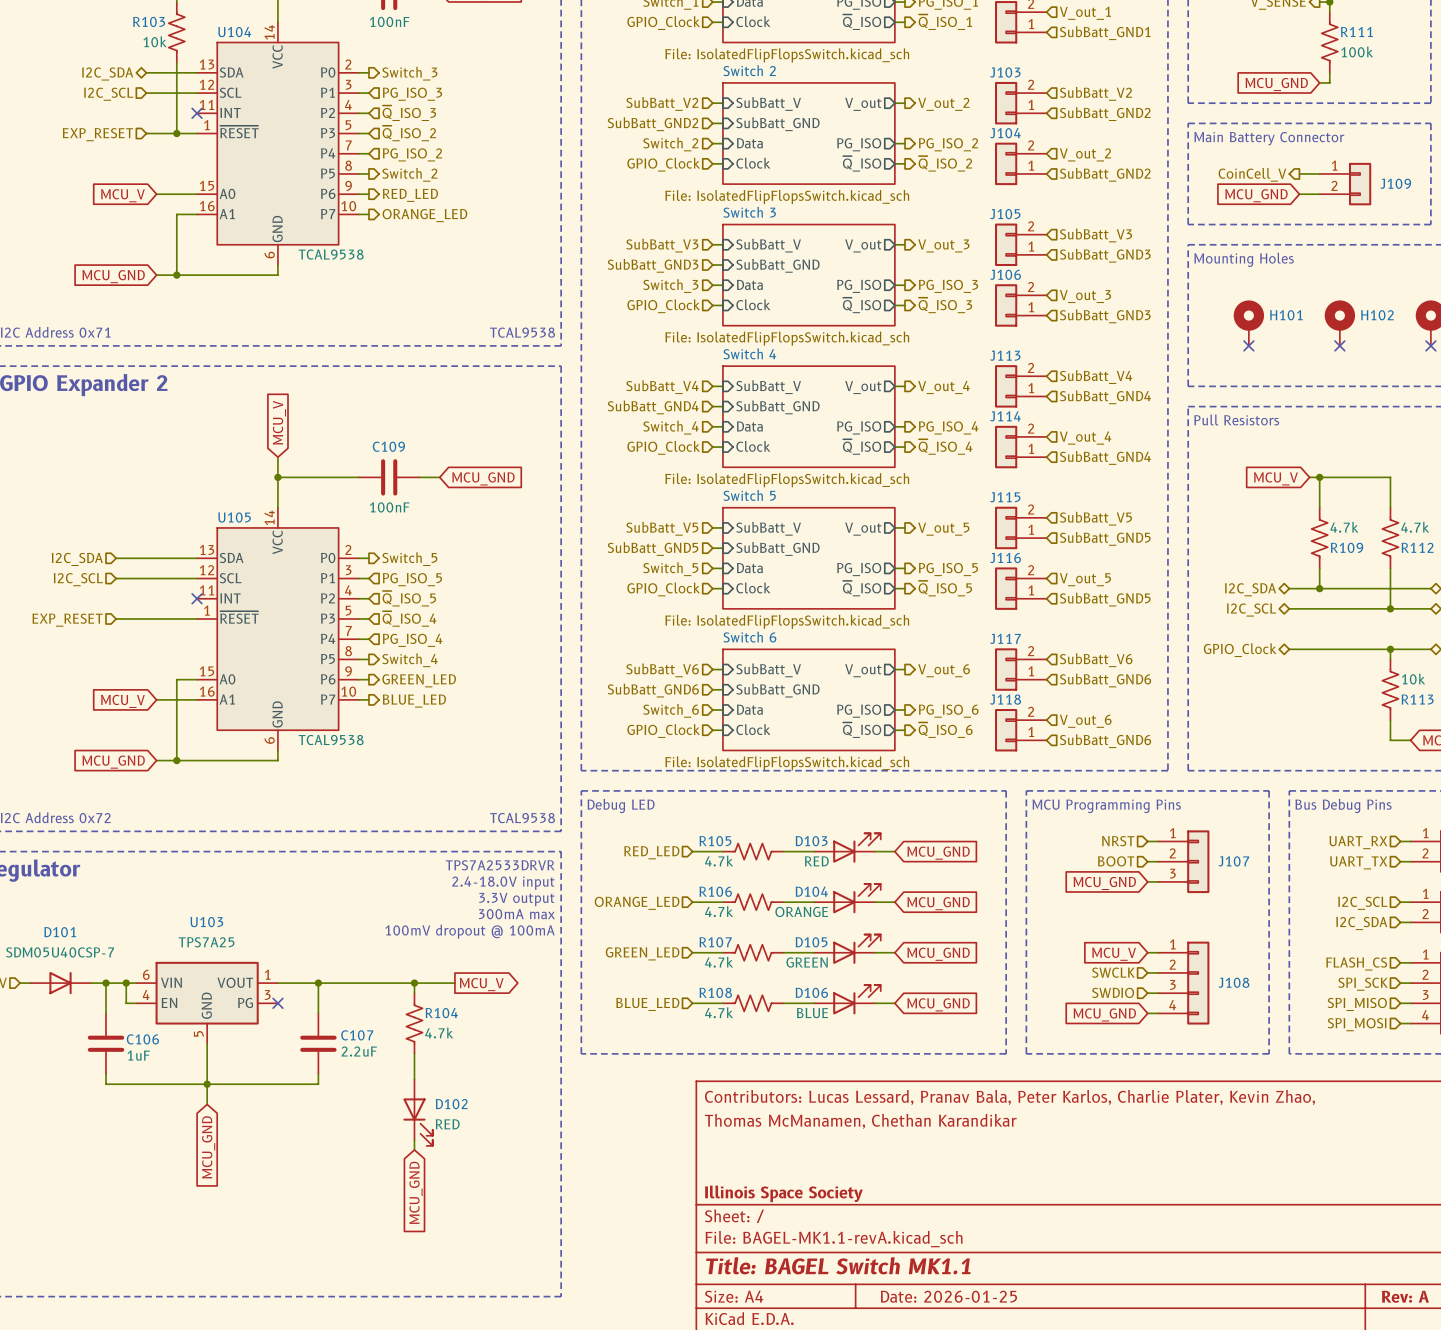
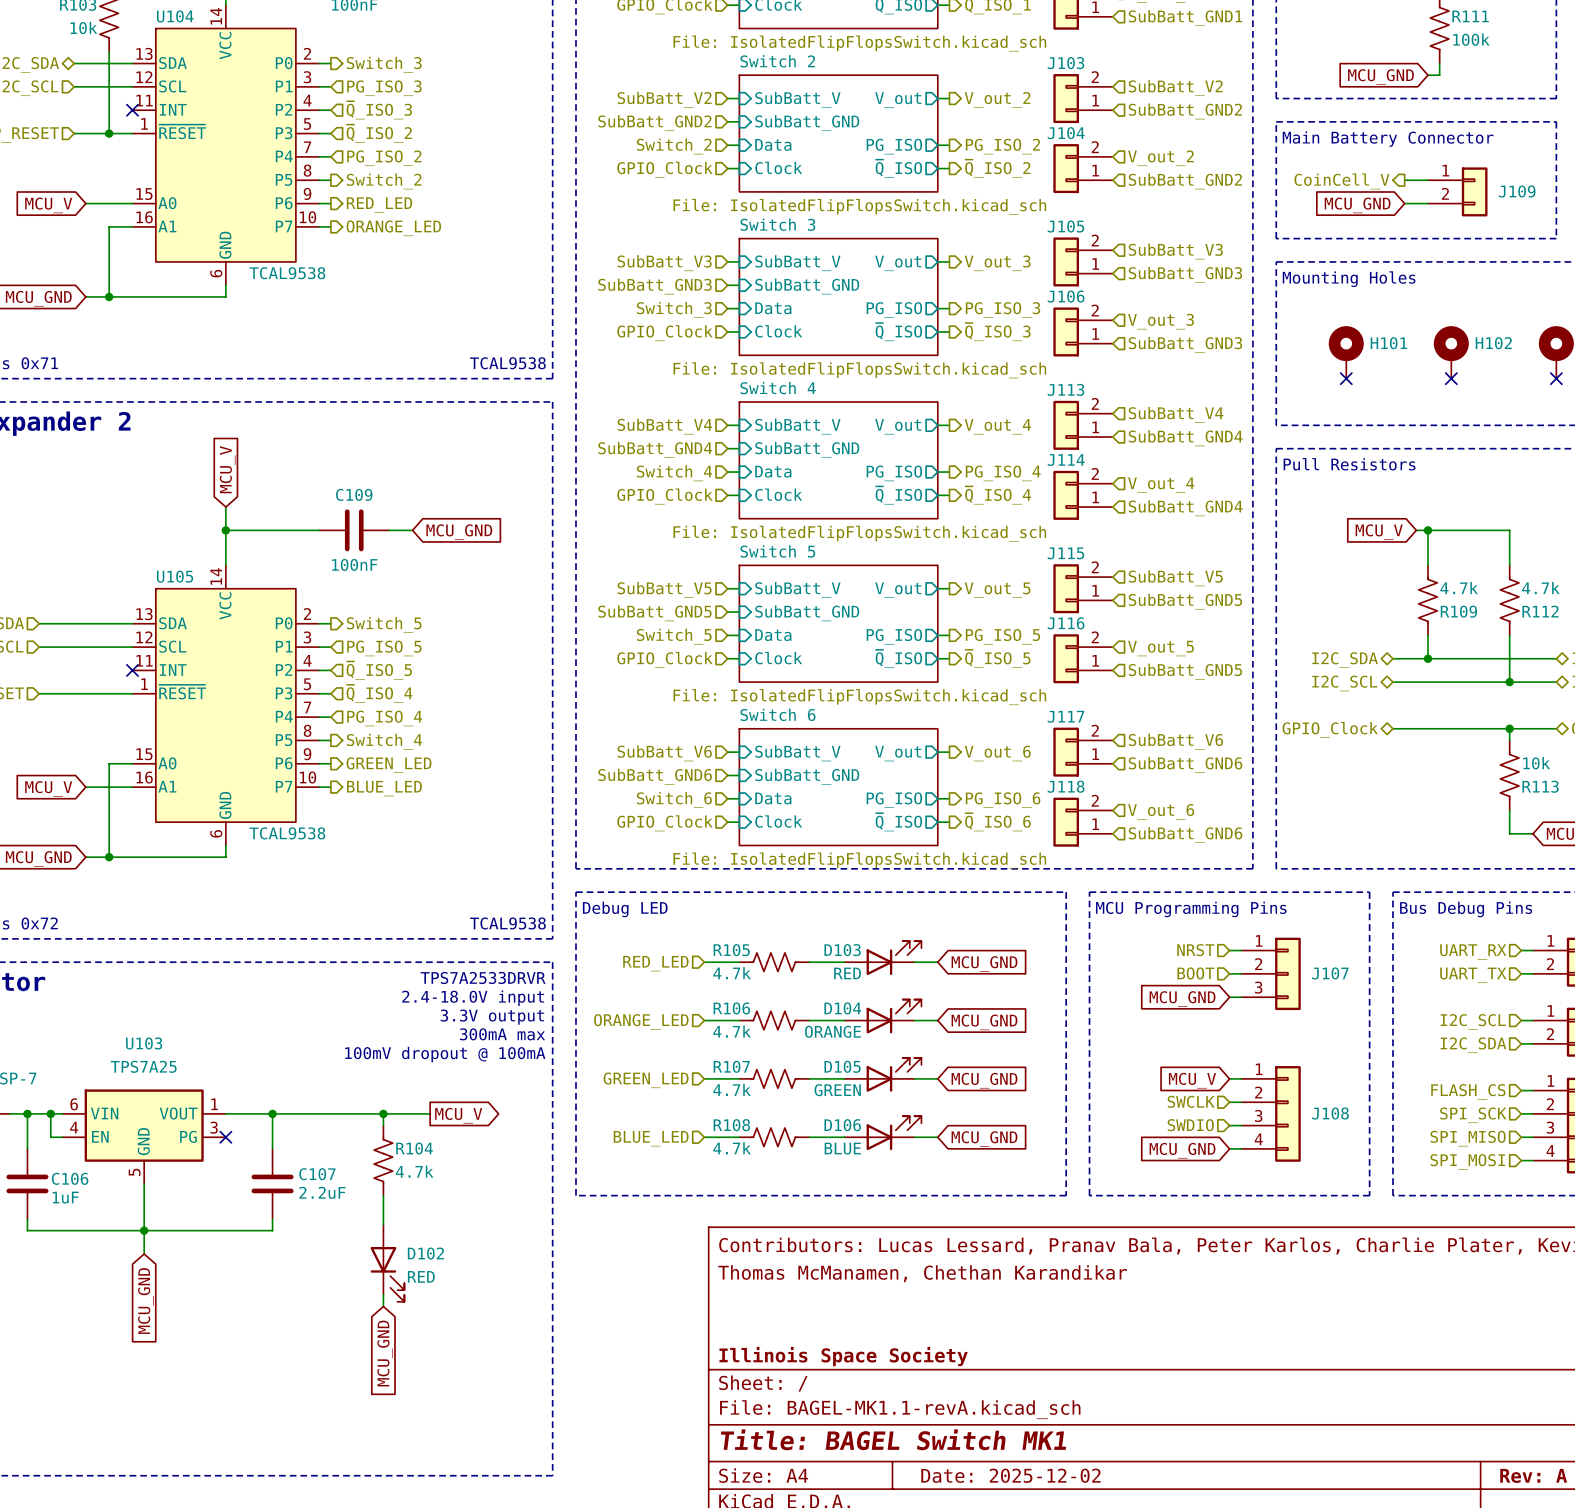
title block: Title: BAGEL Switch MK1.1 (838, 1265) -> Title: BAGEL Switch MK1 (893, 1439)
title block: Date: 2026-01-25 (948, 1296) -> Date: 2025-12-02 (1010, 1475)

